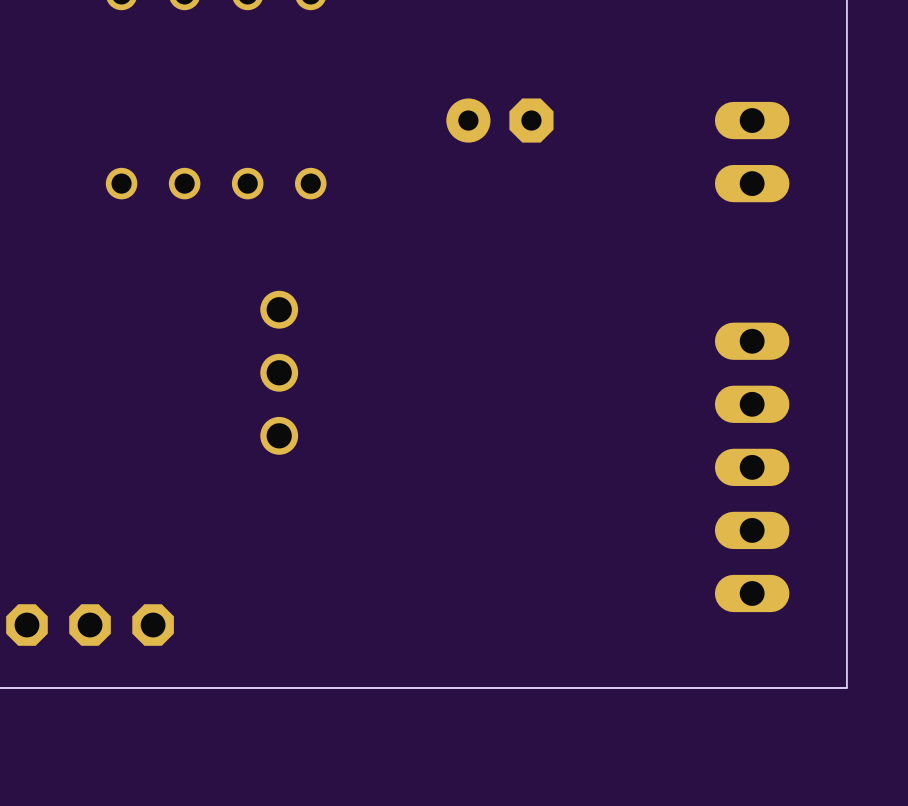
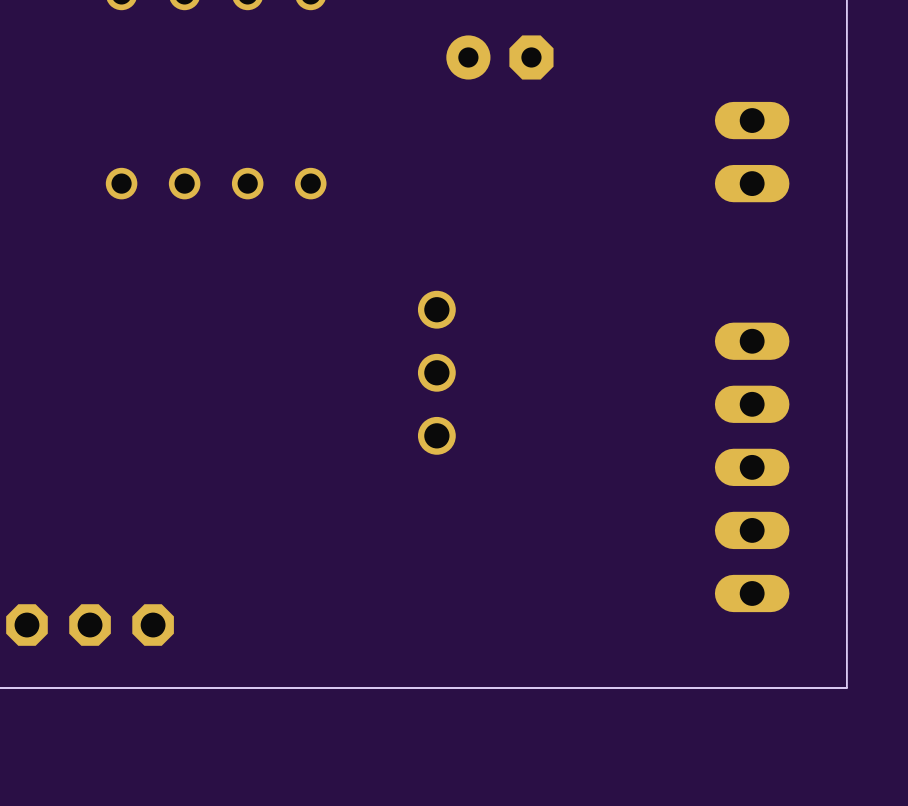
part position: (499, 120) -> (499, 57)
part position: (279, 372) -> (436, 372)

